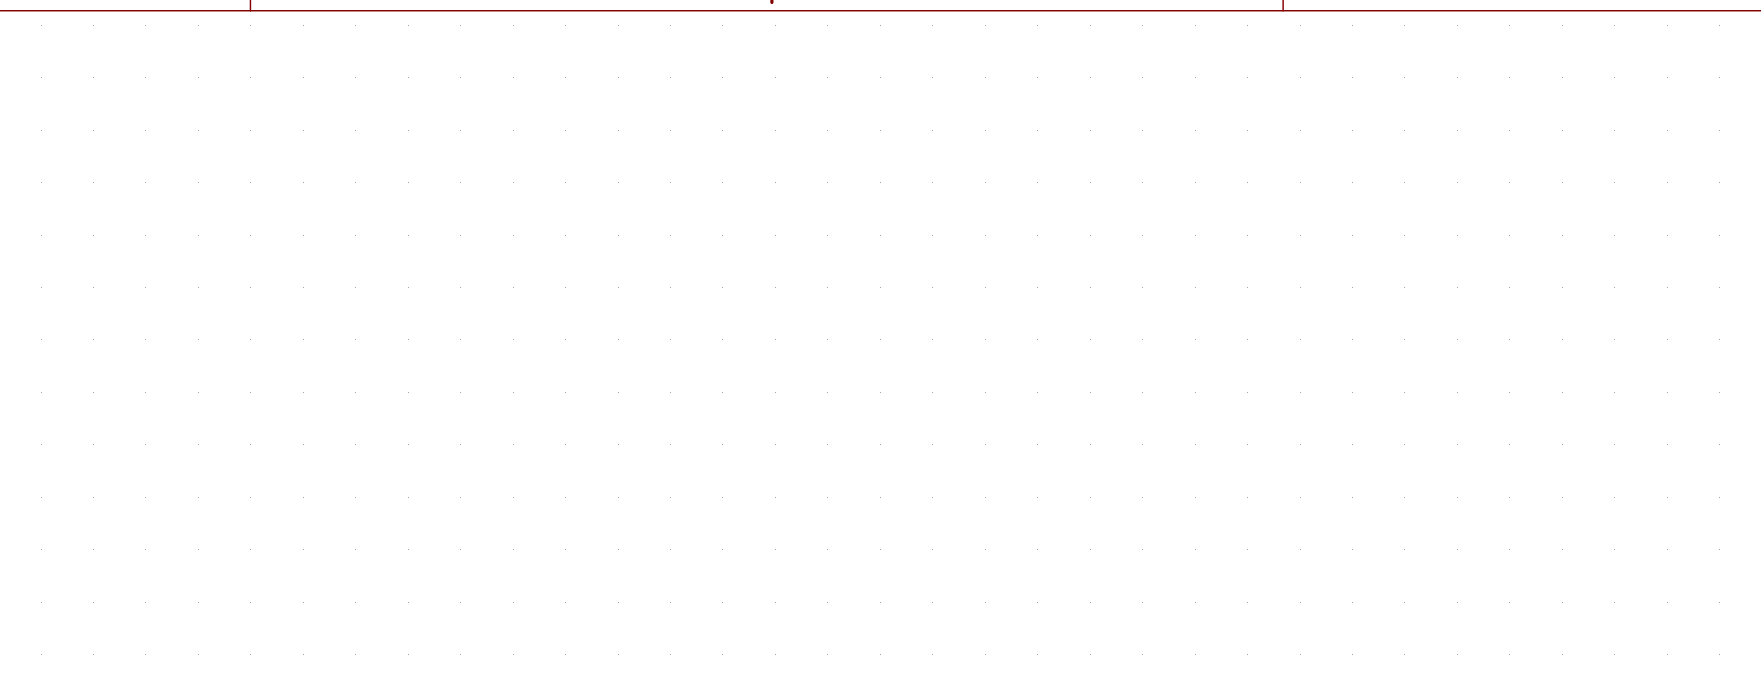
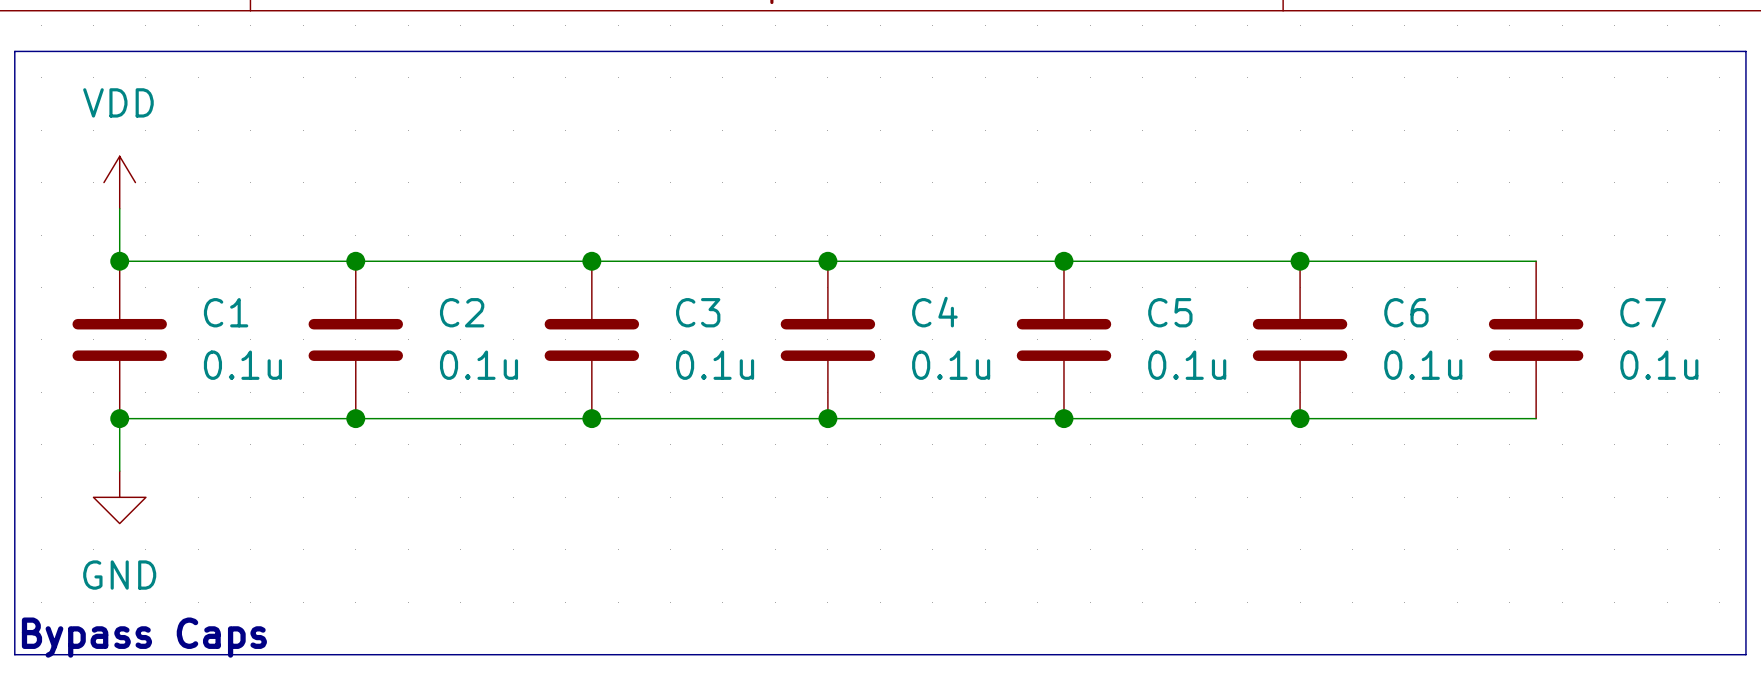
line: none -> (14, 51) (1745, 51) (1745, 654) (14, 654) (14, 51)
power symbol: none -> VDD (119, 182)
wire: none -> (119, 208) (119, 261) (1536, 261)
junction: none -> (119, 261)
junction: none -> (355, 261)
junction: none -> (591, 261)
junction: none -> (827, 261)
junction: none -> (1063, 261)
junction: none -> (1300, 261)
C1: none -> 0.1u (119, 339)
C2: none -> 0.1u (355, 339)
C3: none -> 0.1u (591, 339)
C4: none -> 0.1u (827, 339)
C5: none -> 0.1u (1063, 339)
C6: none -> 0.1u (1300, 339)
C7: none -> 0.1u (1536, 339)
junction: none -> (119, 418)
junction: none -> (355, 418)
junction: none -> (591, 418)
junction: none -> (827, 418)
junction: none -> (1063, 418)
junction: none -> (1300, 418)
wire: none -> (1536, 418) (119, 418) (119, 471)
power symbol: none -> GND (119, 497)
text: none -> Bypass Caps (144, 637)

